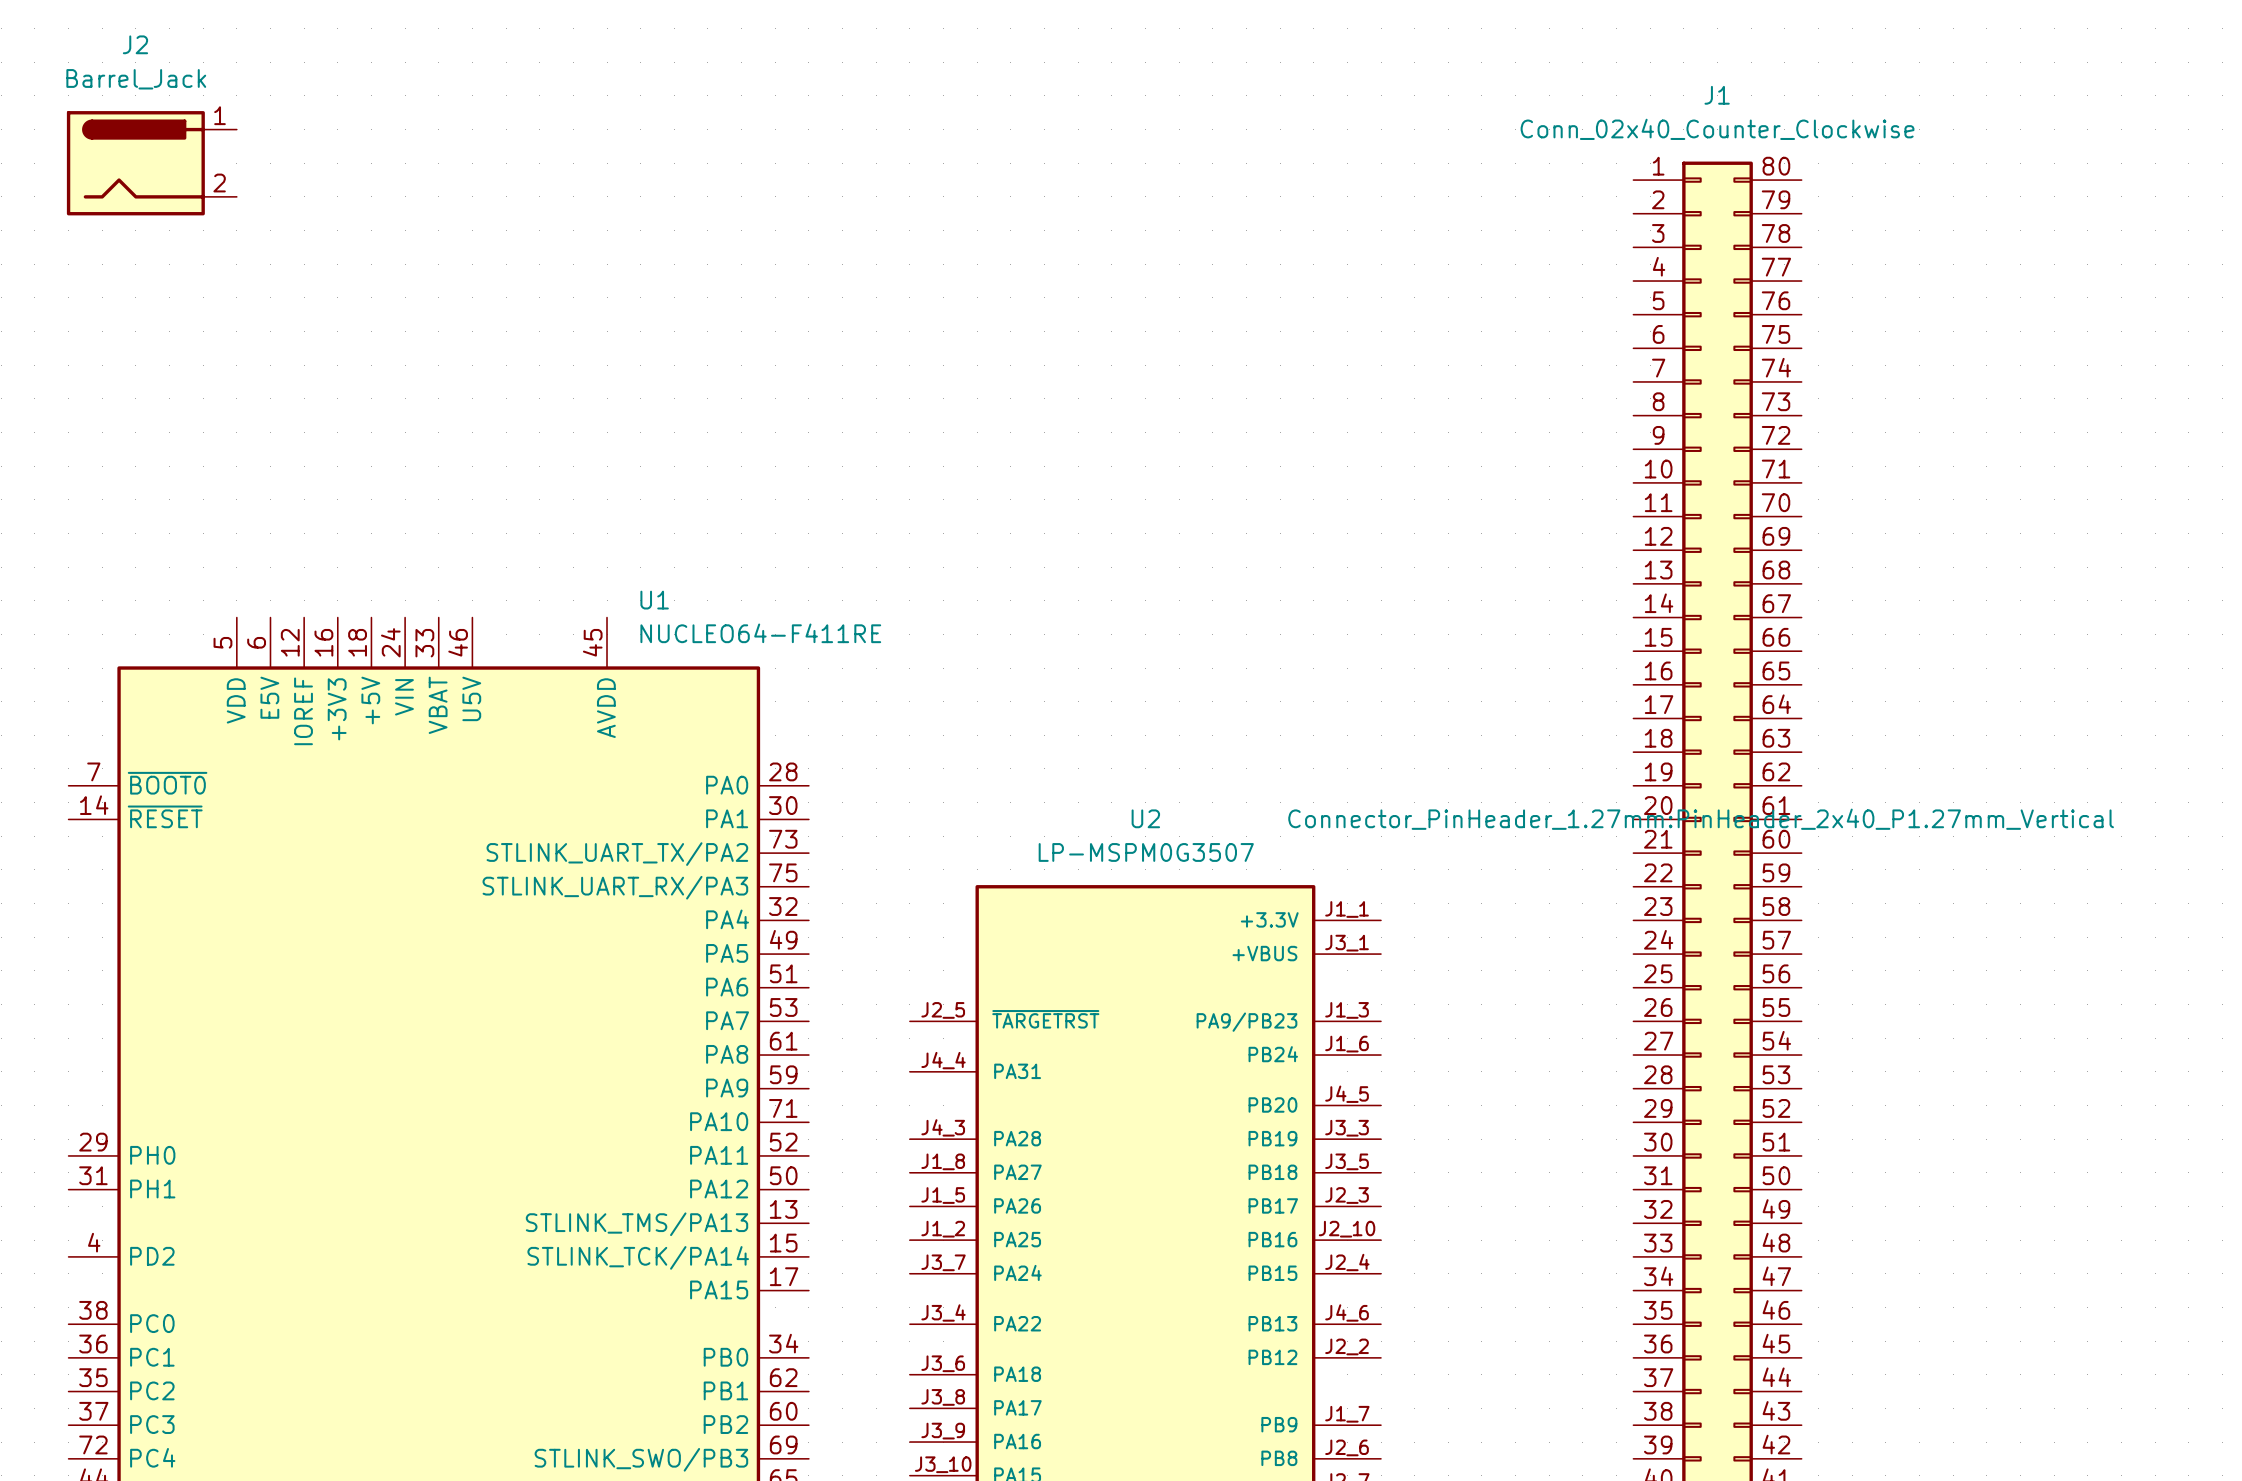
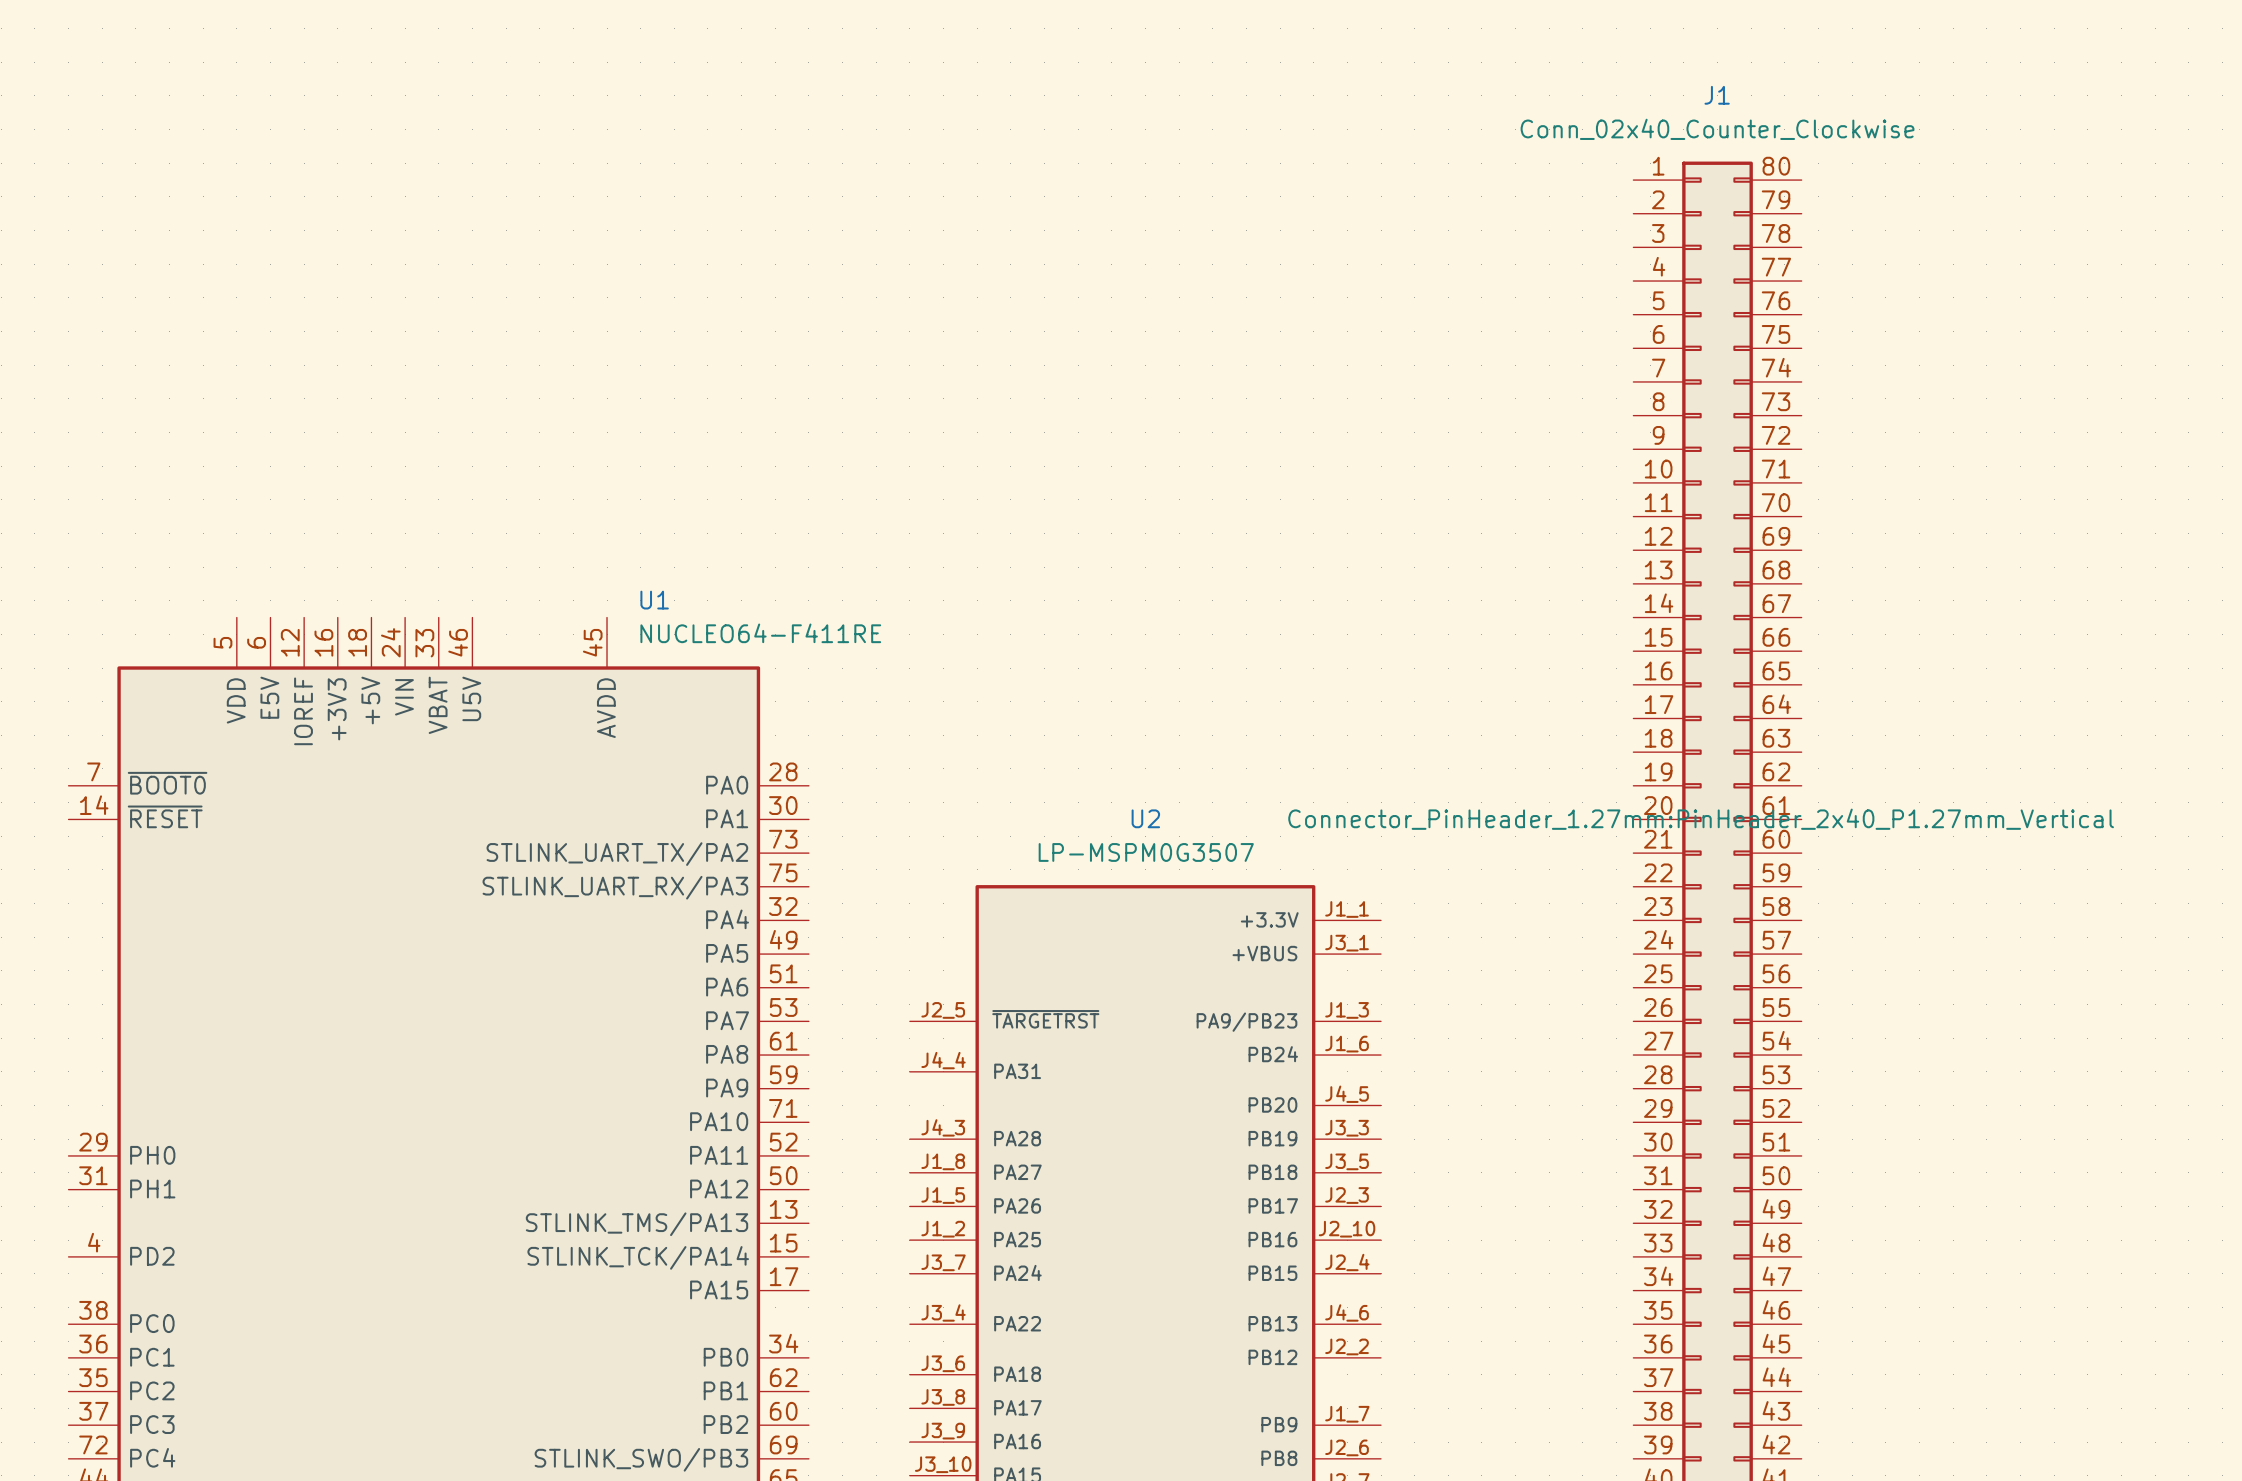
J2: Barrel_Jack (151, 163) -> none

